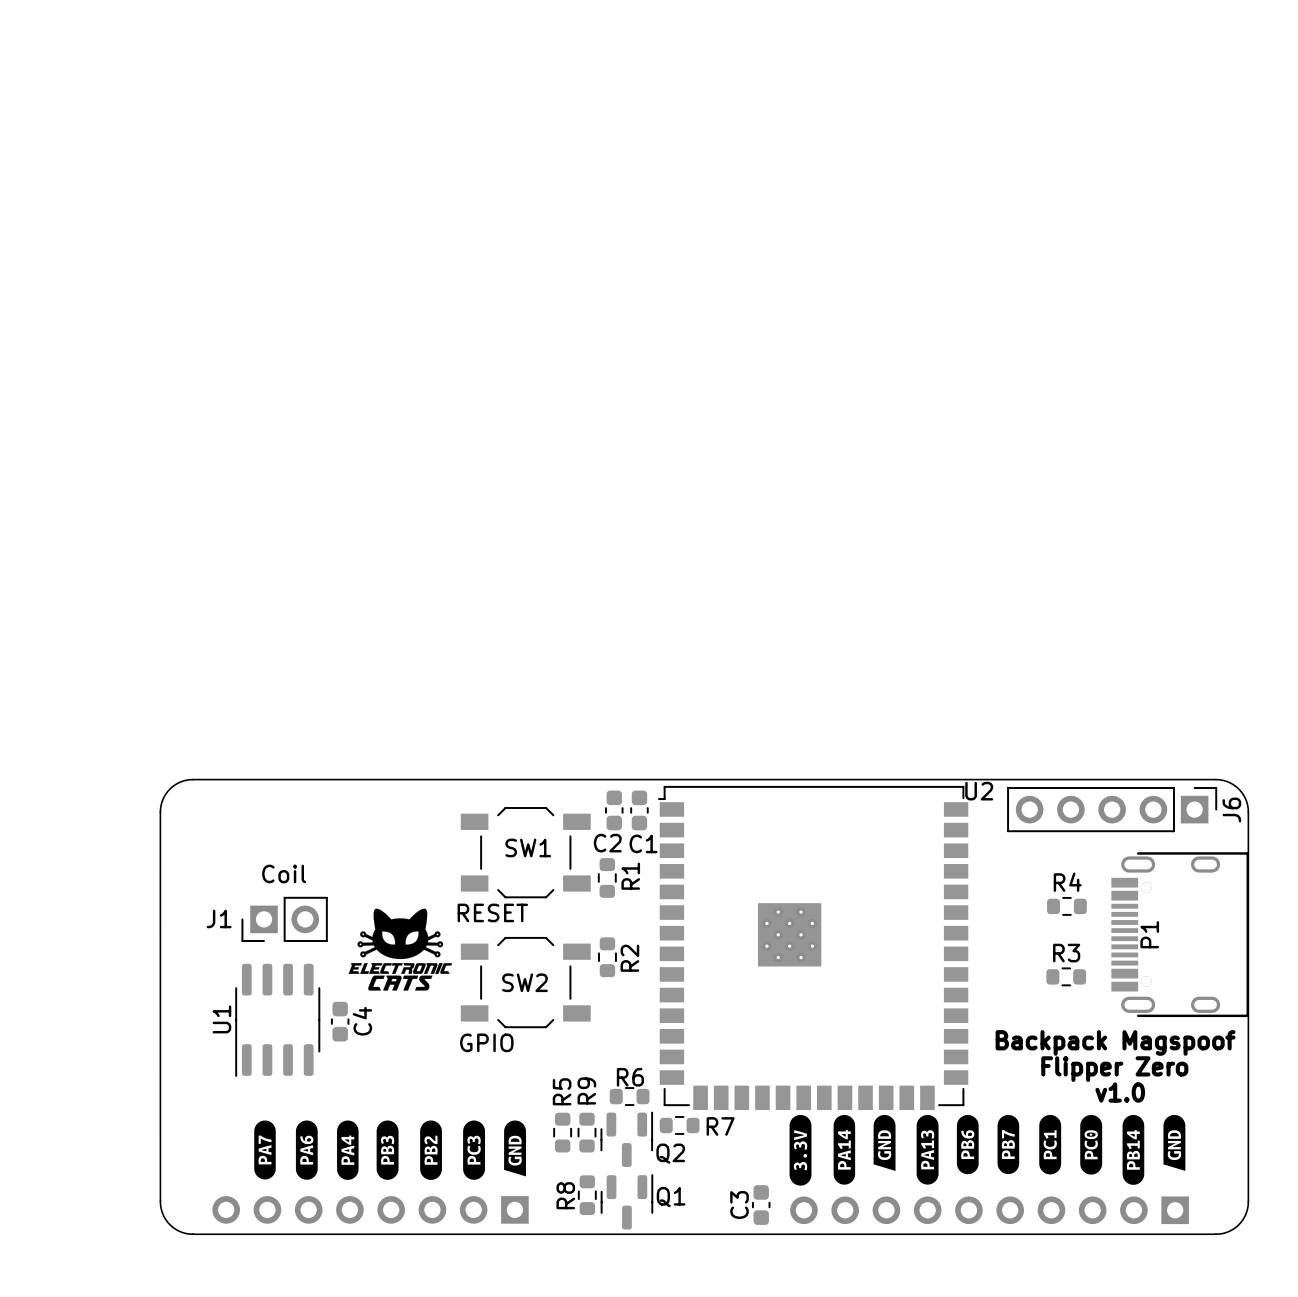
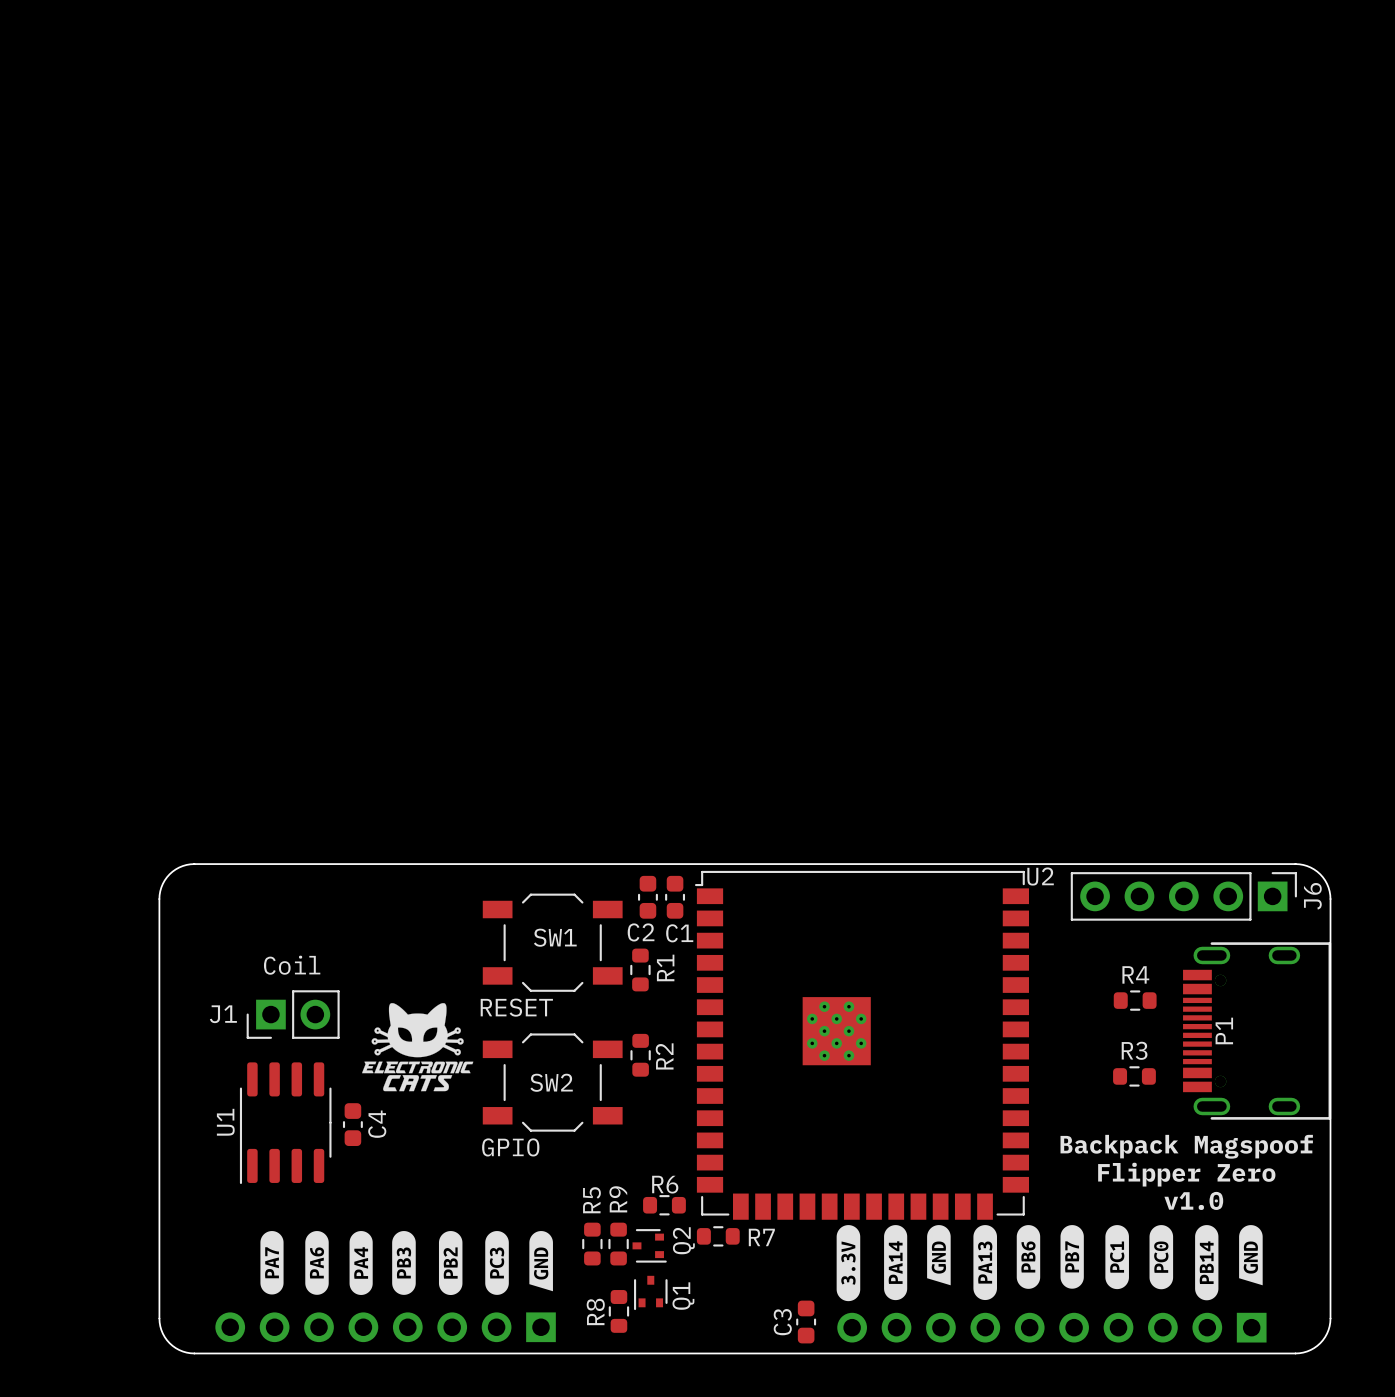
Q2 footprint: [600, 1111, 654, 1167] -> [632, 1229, 667, 1263]
Q1 footprint: [600, 1174, 654, 1230] -> [634, 1275, 668, 1311]

